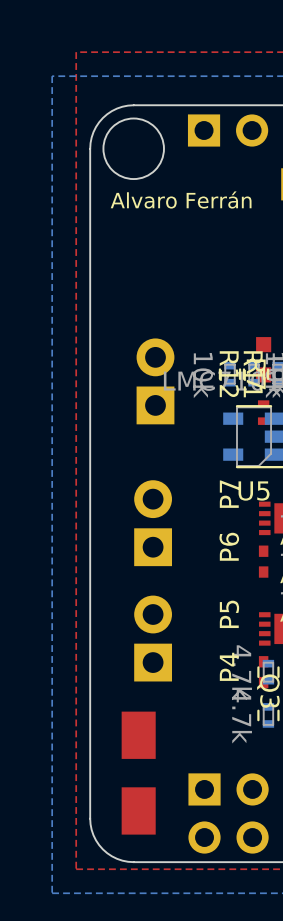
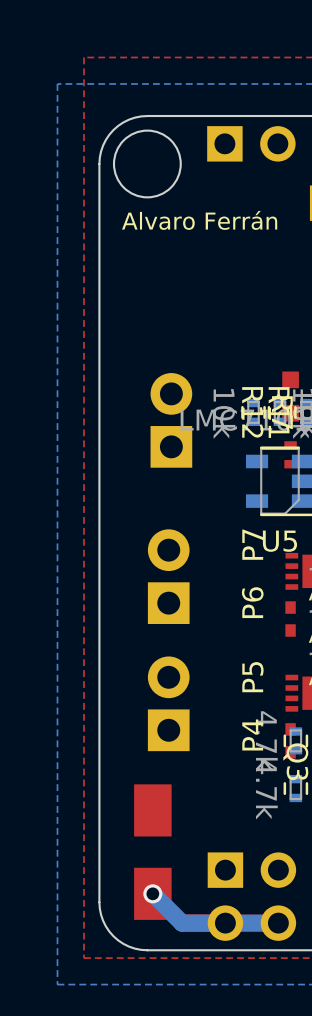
bottom track: none -> (152, 893) (182, 923) (278, 923)
via: none -> (152, 893)

